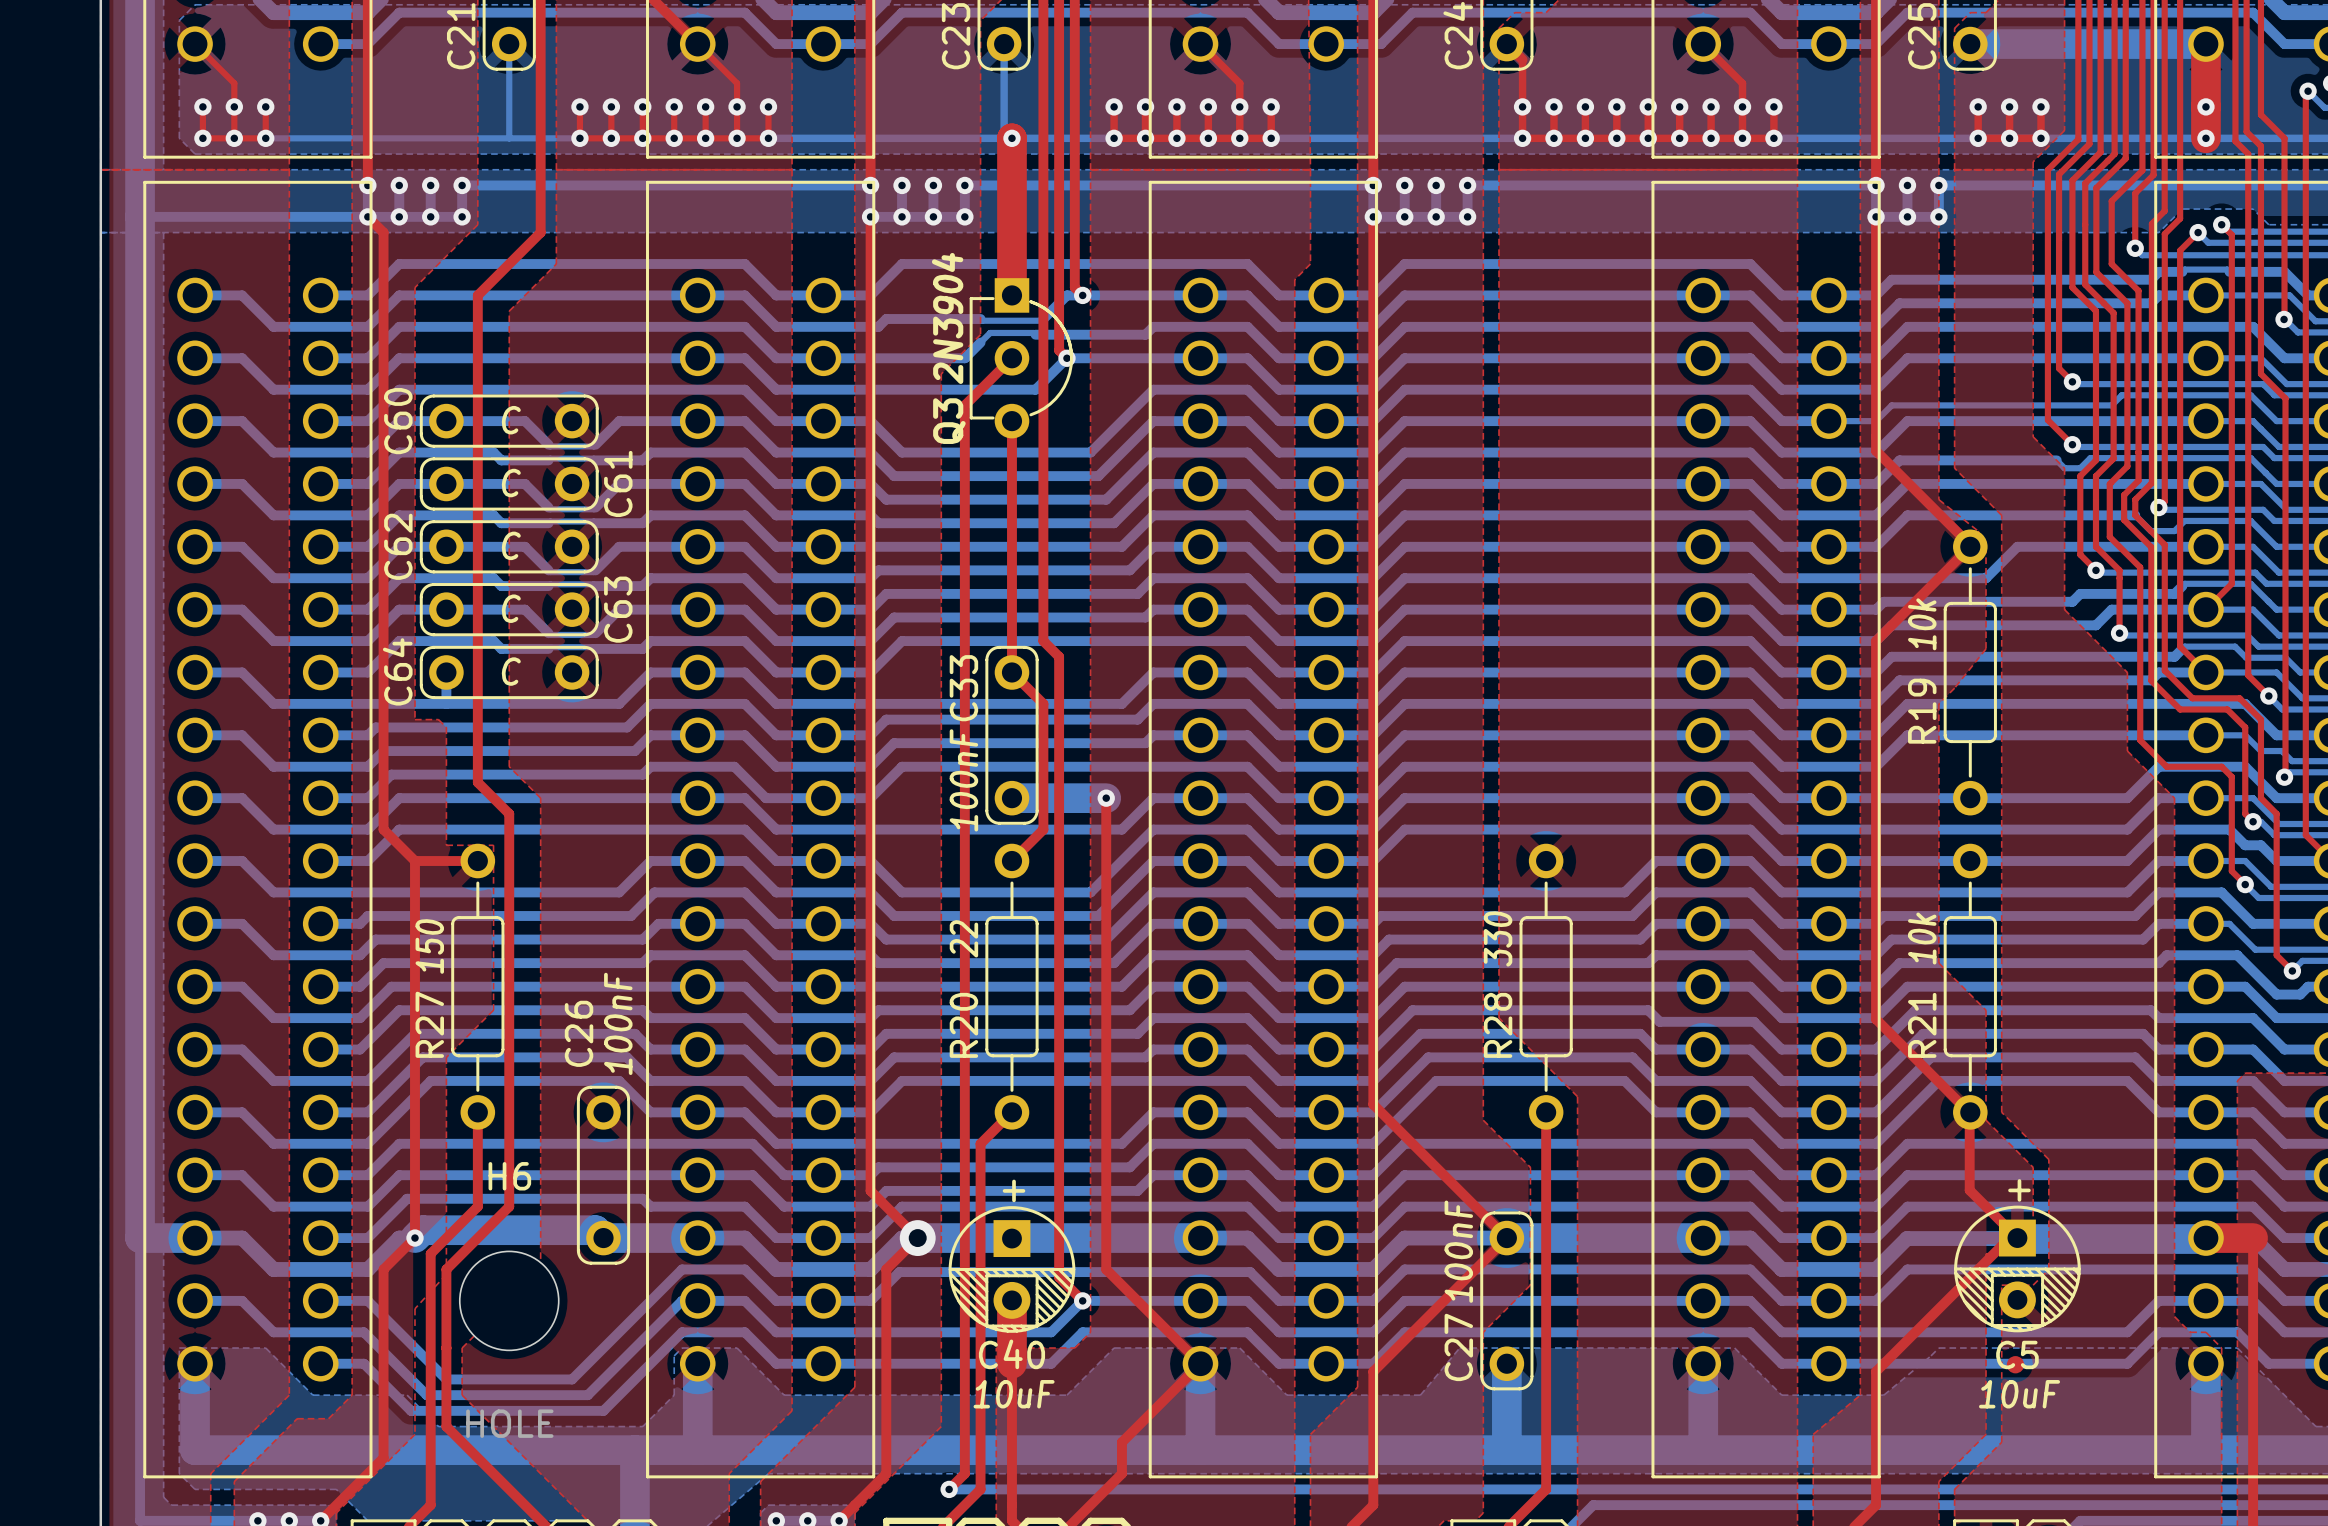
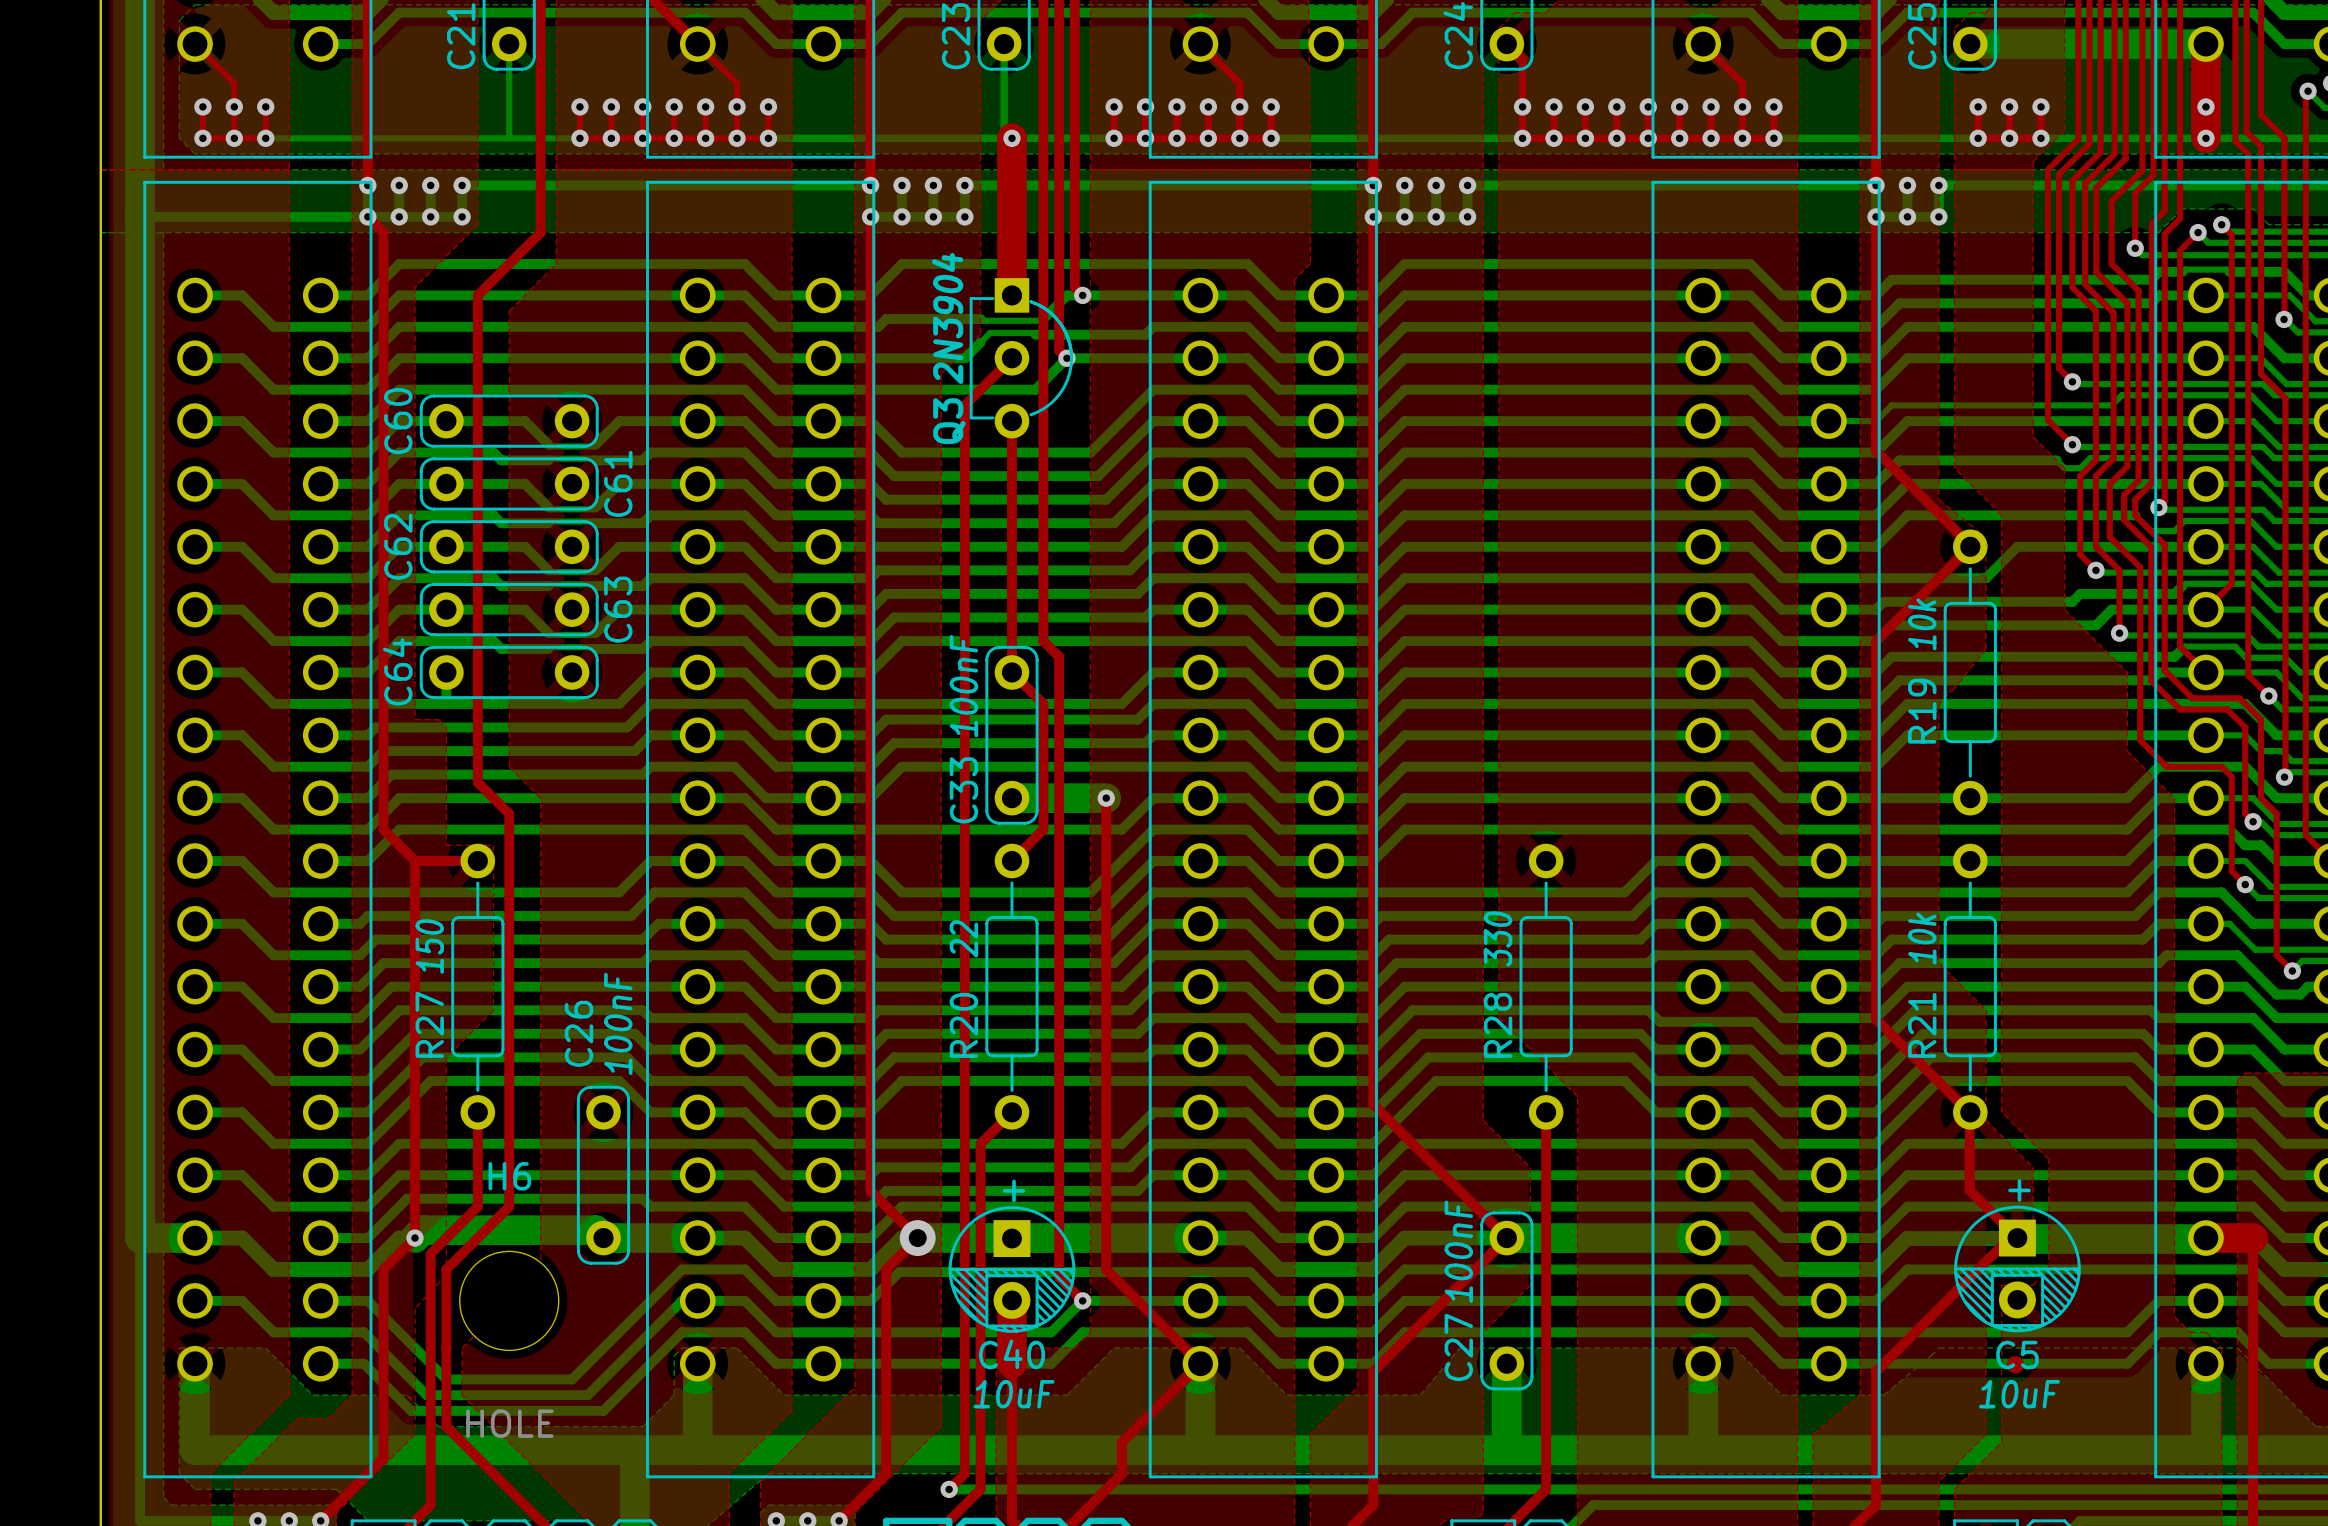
C60 value: C (511, 420) -> none
C61 value: C (511, 483) -> none
C62 value: C (511, 545) -> none
C63 value: C (511, 608) -> none
C64 value: C (511, 671) -> none
C33 name position: C33 (963, 688) -> C33 (963, 790)
C33 value position: 100nF (963, 780) -> 100nF (963, 686)

